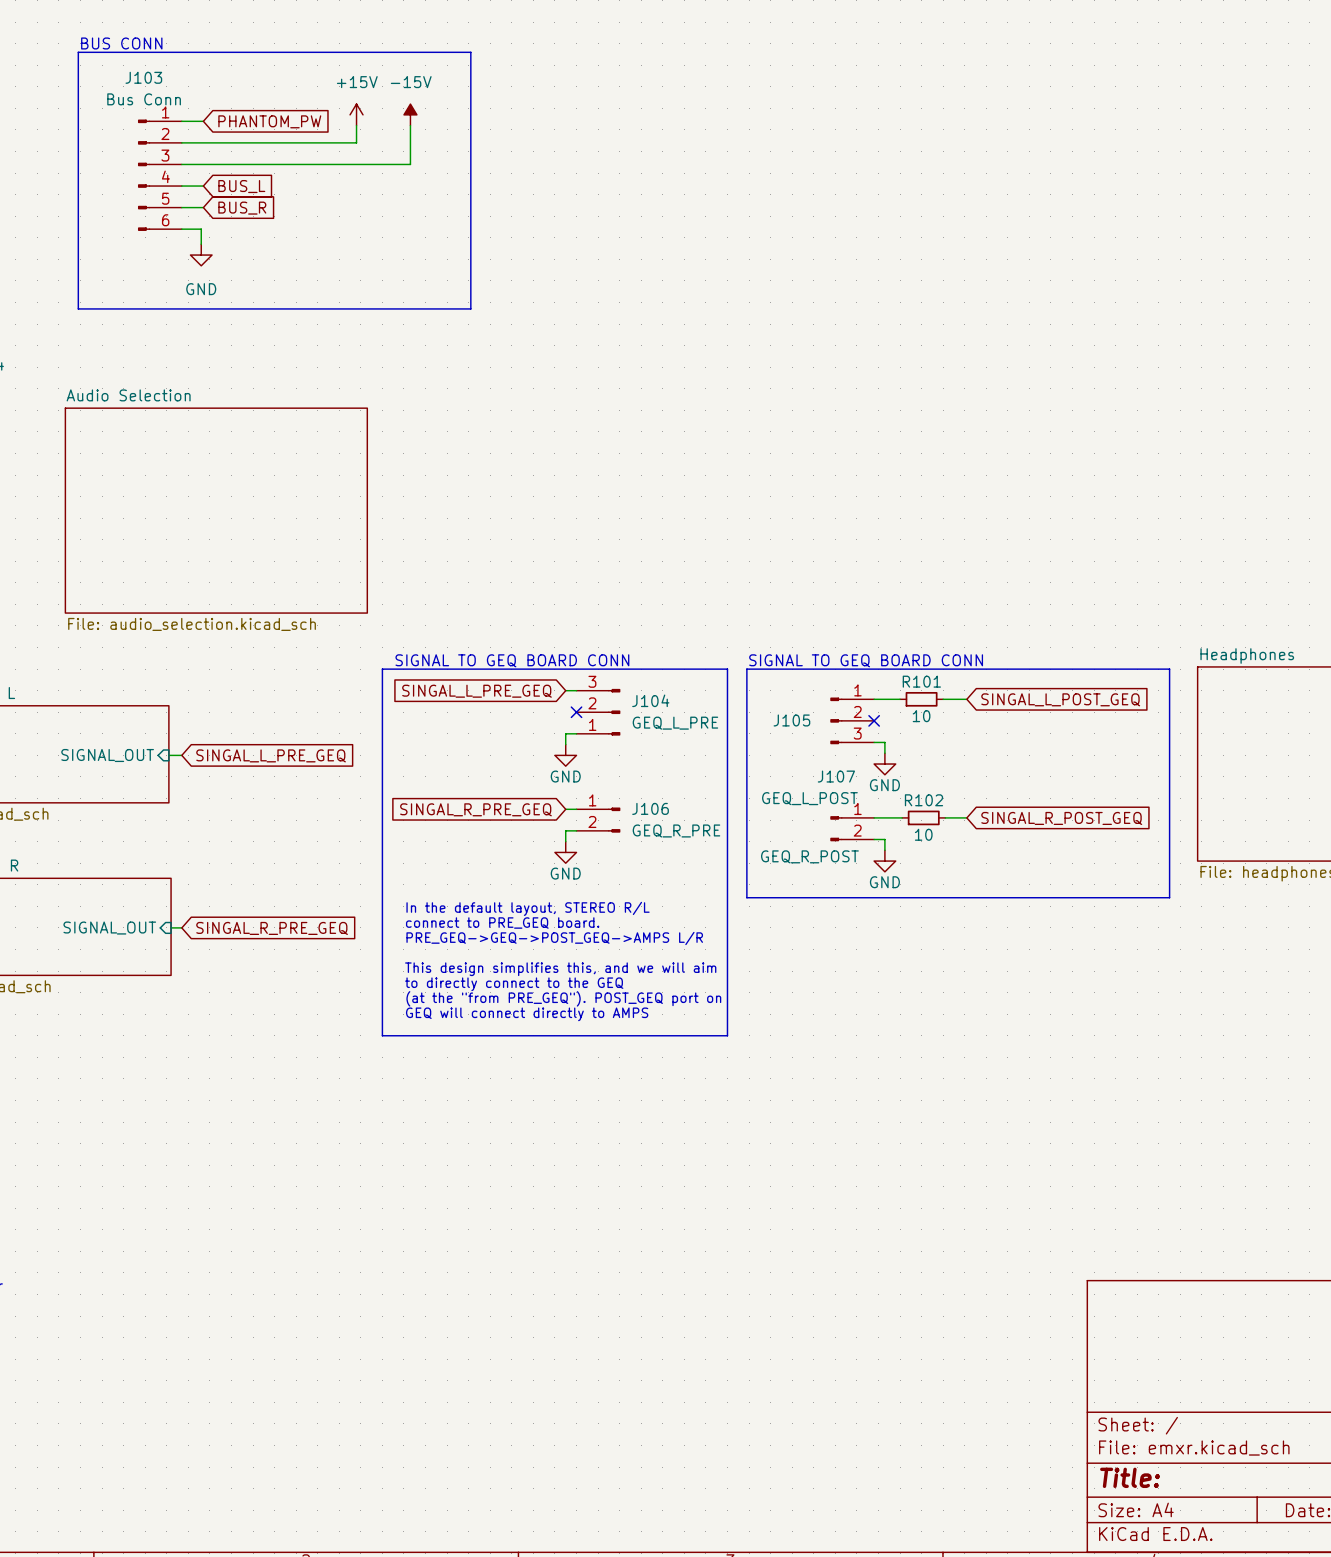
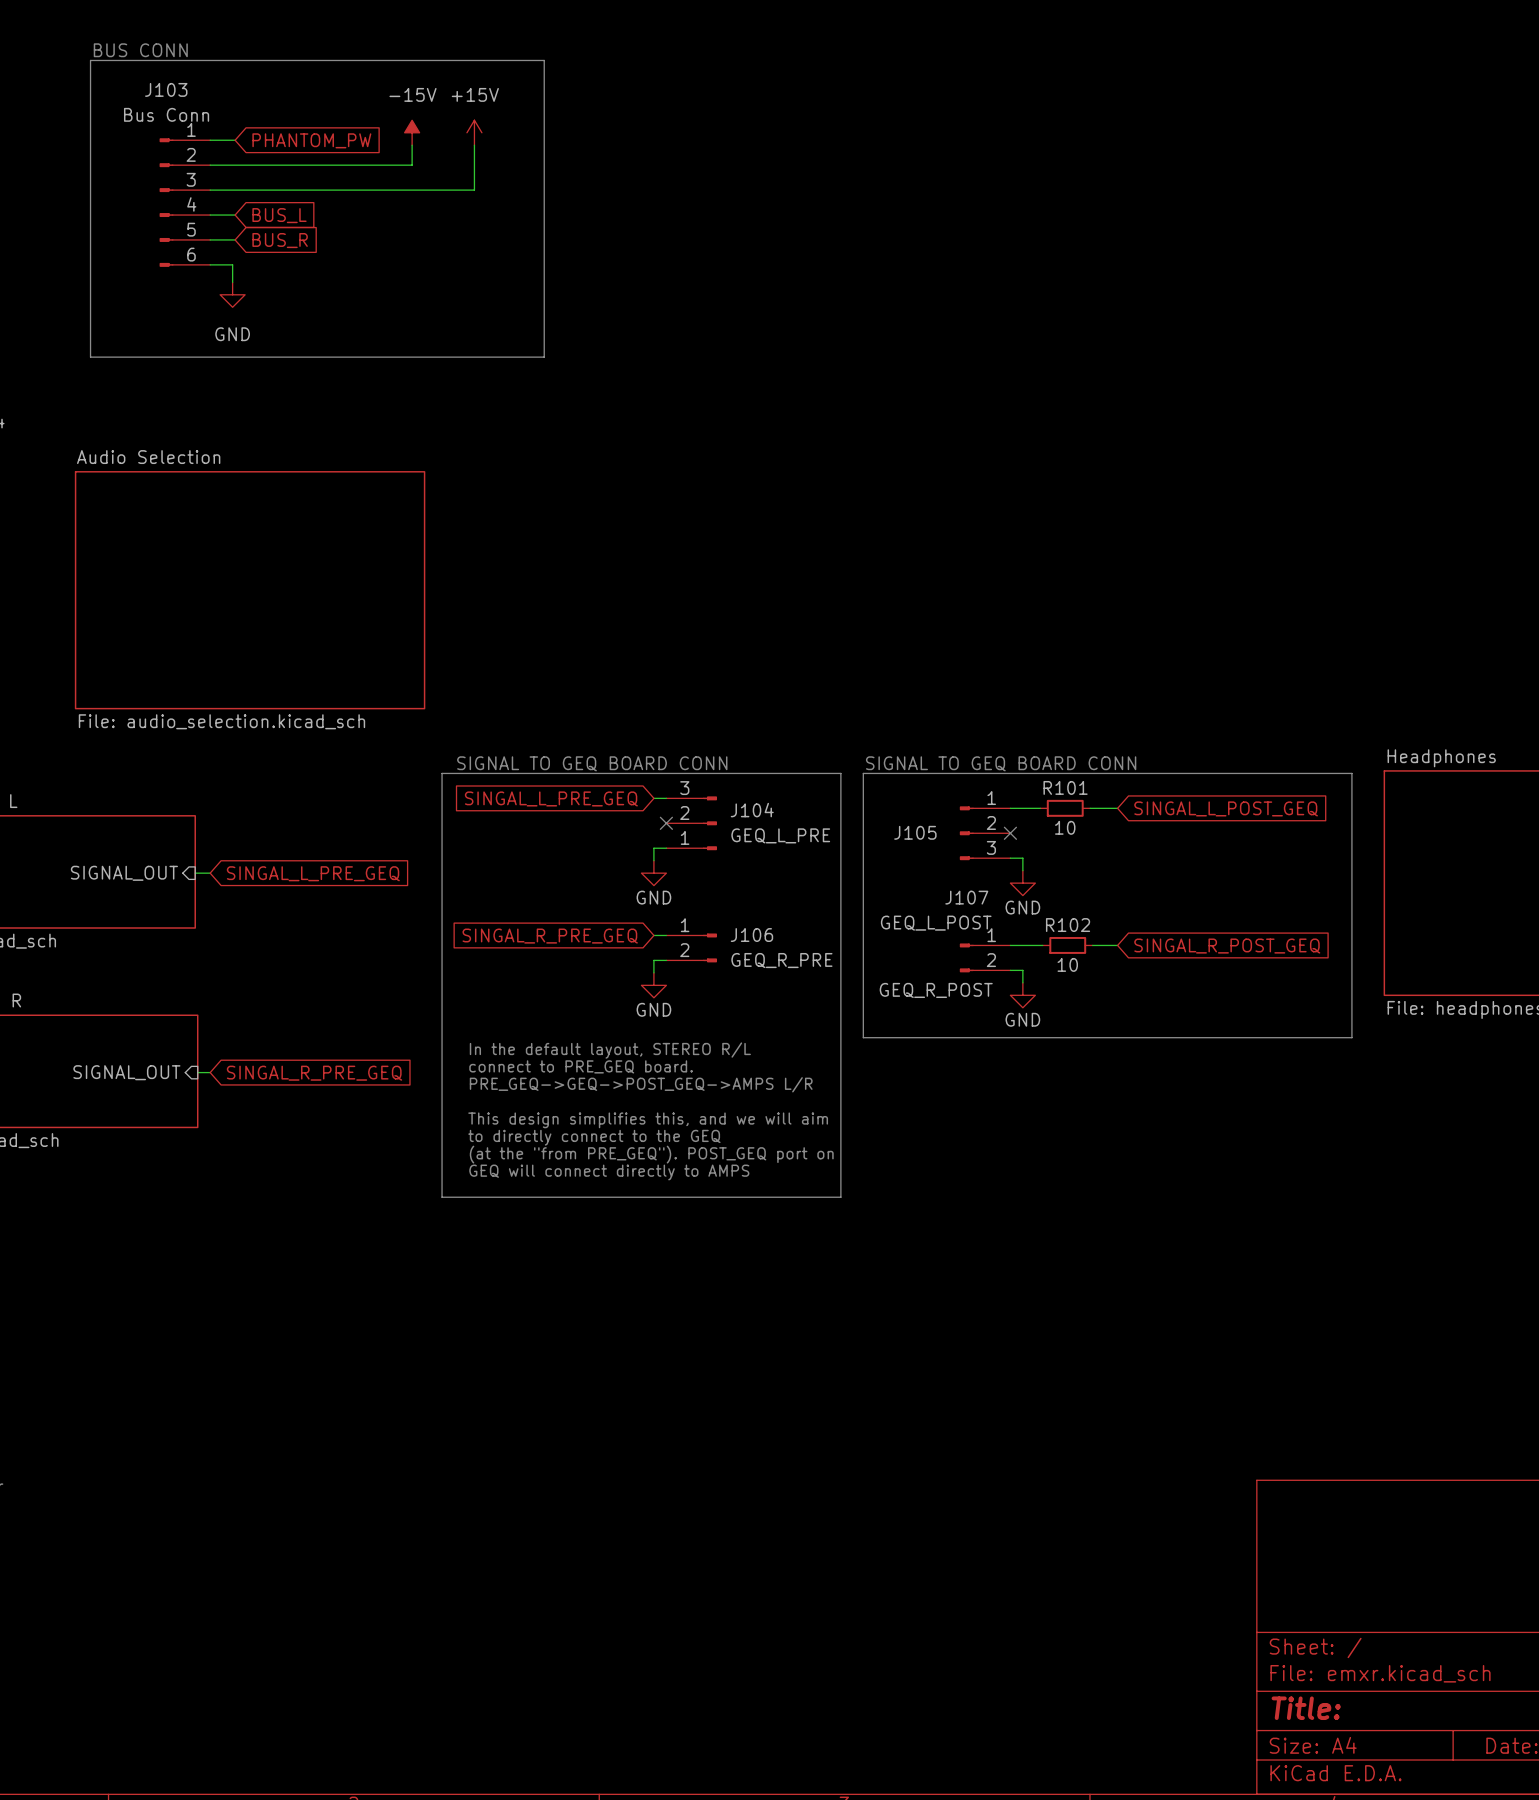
power symbol: +15V (356, 114) -> -15V (412, 132)
power symbol: -15V (410, 114) -> +15V (474, 132)

